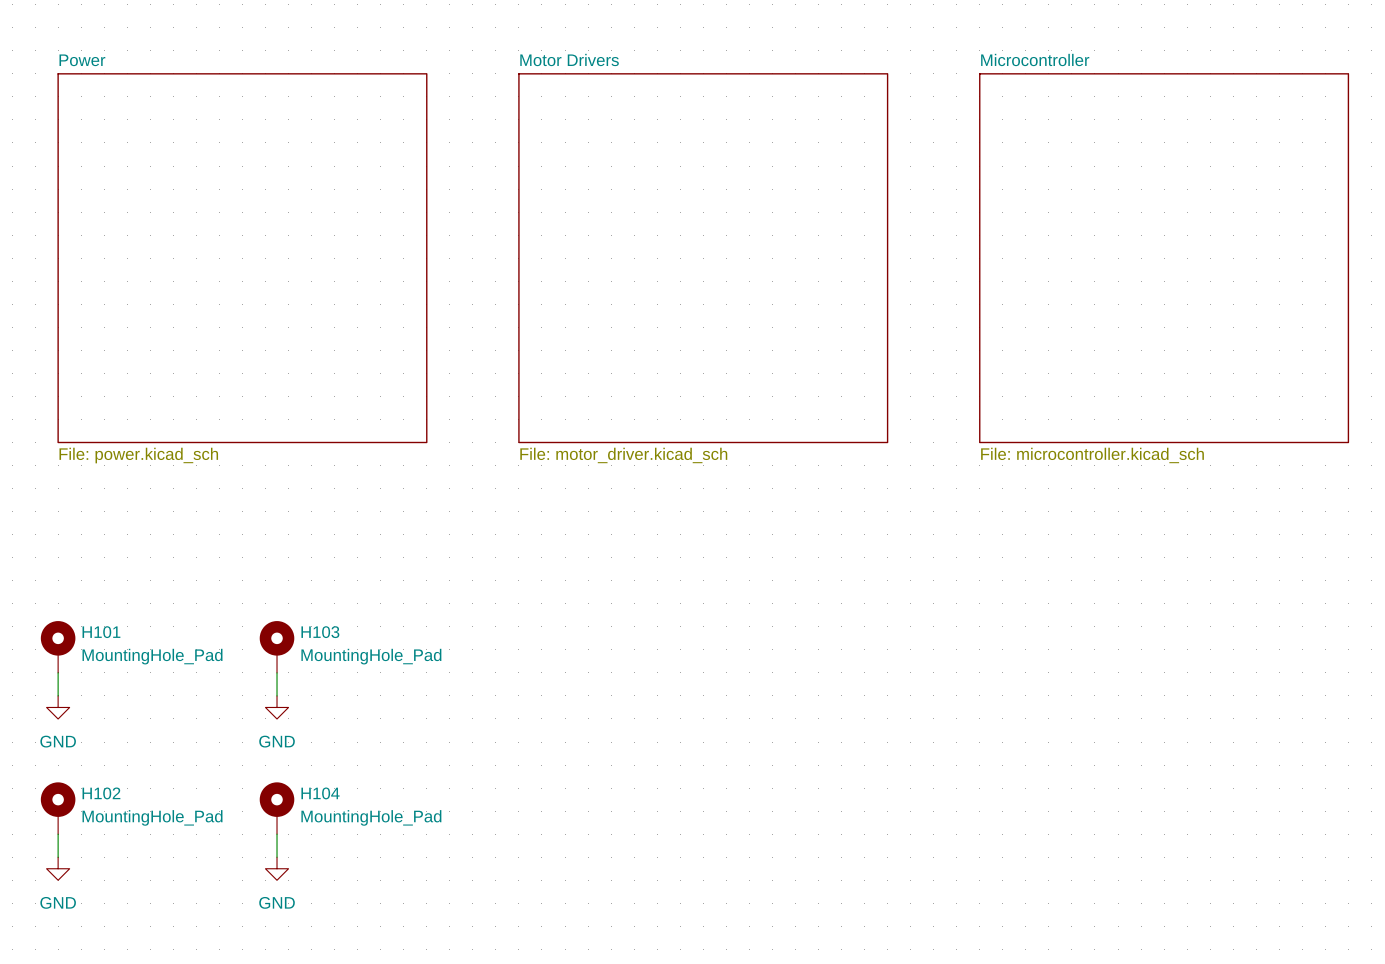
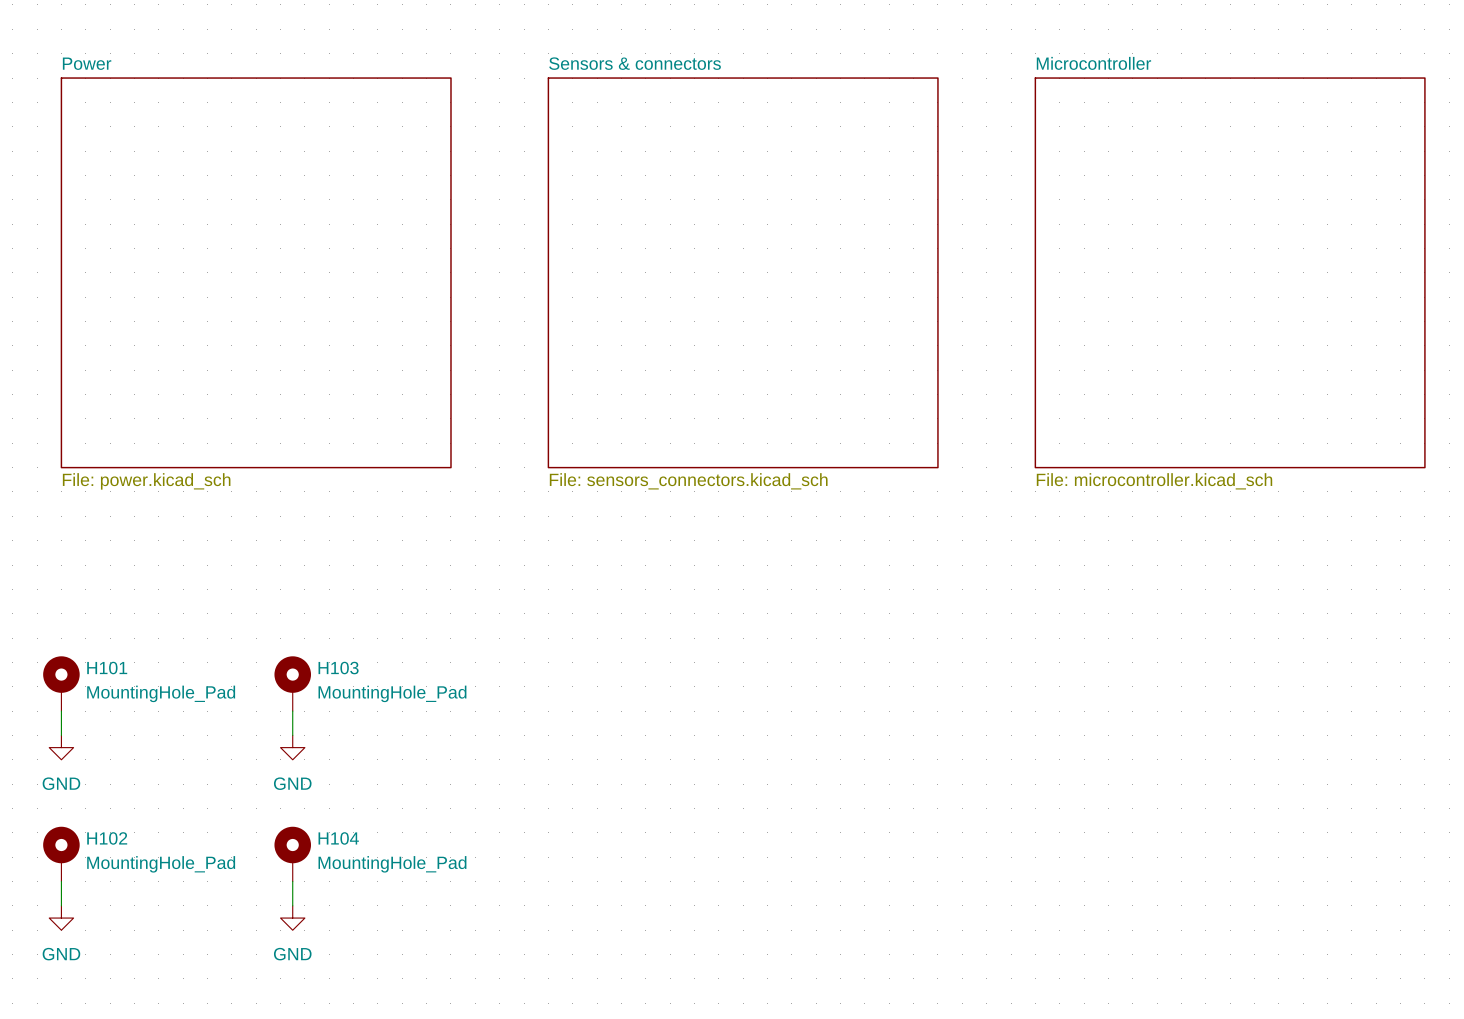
sheet Motor Drivers name: Motor Drivers (569, 59) -> Sensors & connectors (635, 63)
sheet Motor Drivers value: File: motor_driver.kicad_sch (623, 455) -> File: sensors_connectors.kicad_sch (688, 481)

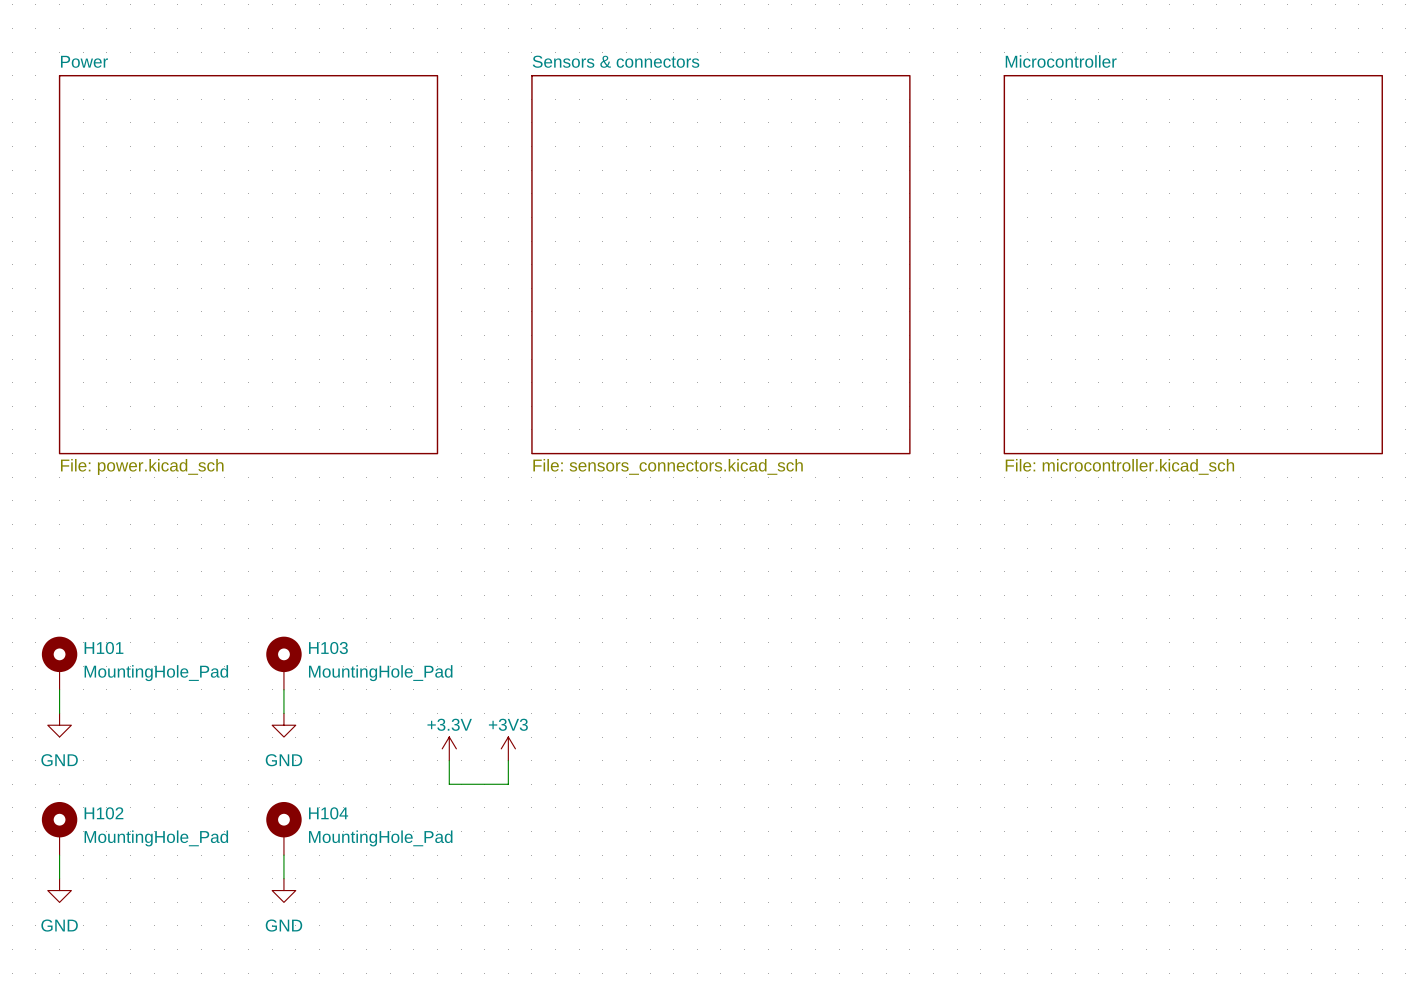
power symbol: none -> +3.3V (449, 748)
power symbol: none -> +3V3 (508, 748)
wire: none -> (449, 760) (449, 784) (508, 784) (508, 760)

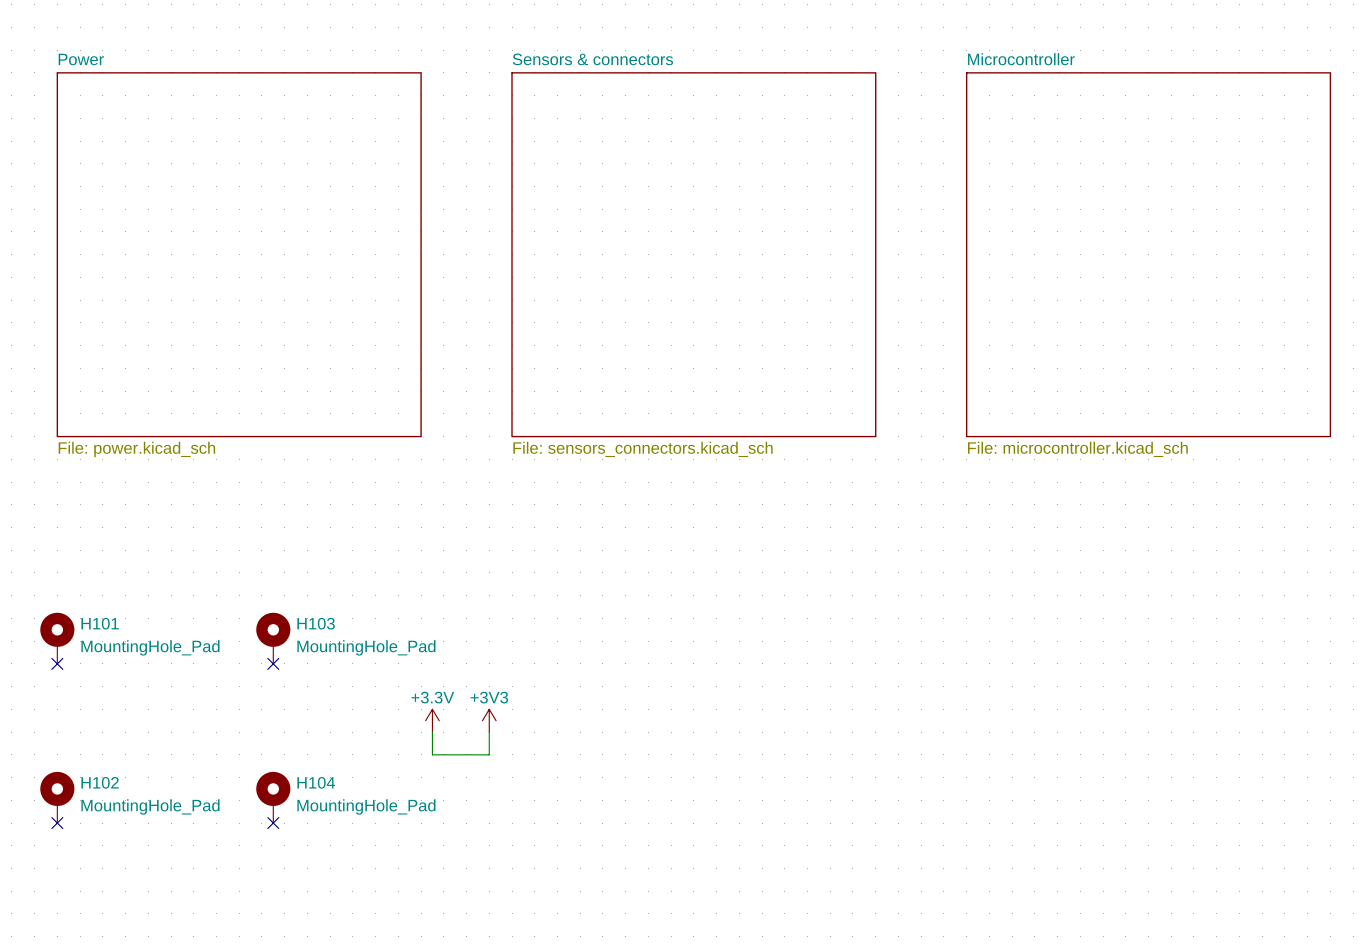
wire: (59, 689) (59, 713) -> none
no-connect mark: none -> (57, 663)
wire: (283, 689) (283, 713) -> none
no-connect mark: none -> (273, 663)
power symbol: GND (59, 725) -> none
power symbol: GND (283, 725) -> none
wire: (59, 855) (59, 878) -> none
no-connect mark: none -> (57, 823)
wire: (283, 855) (283, 878) -> none
no-connect mark: none -> (273, 823)
power symbol: GND (59, 890) -> none
power symbol: GND (283, 890) -> none

